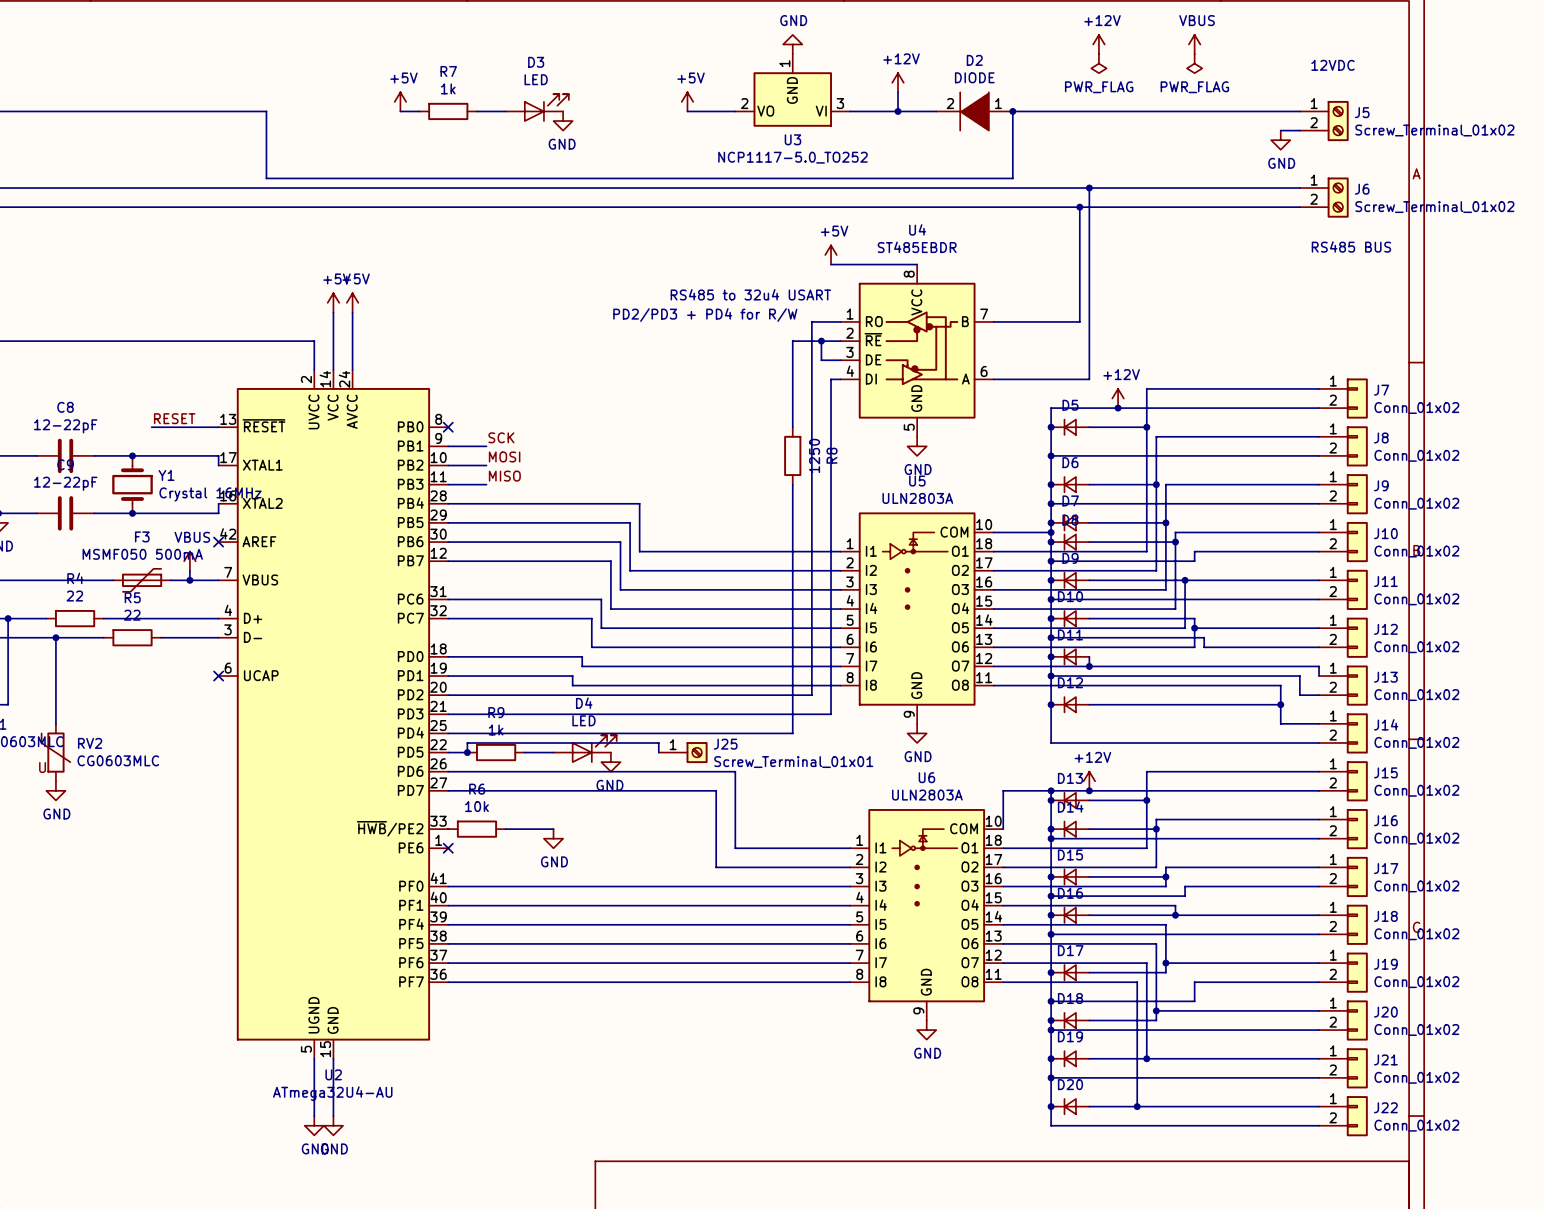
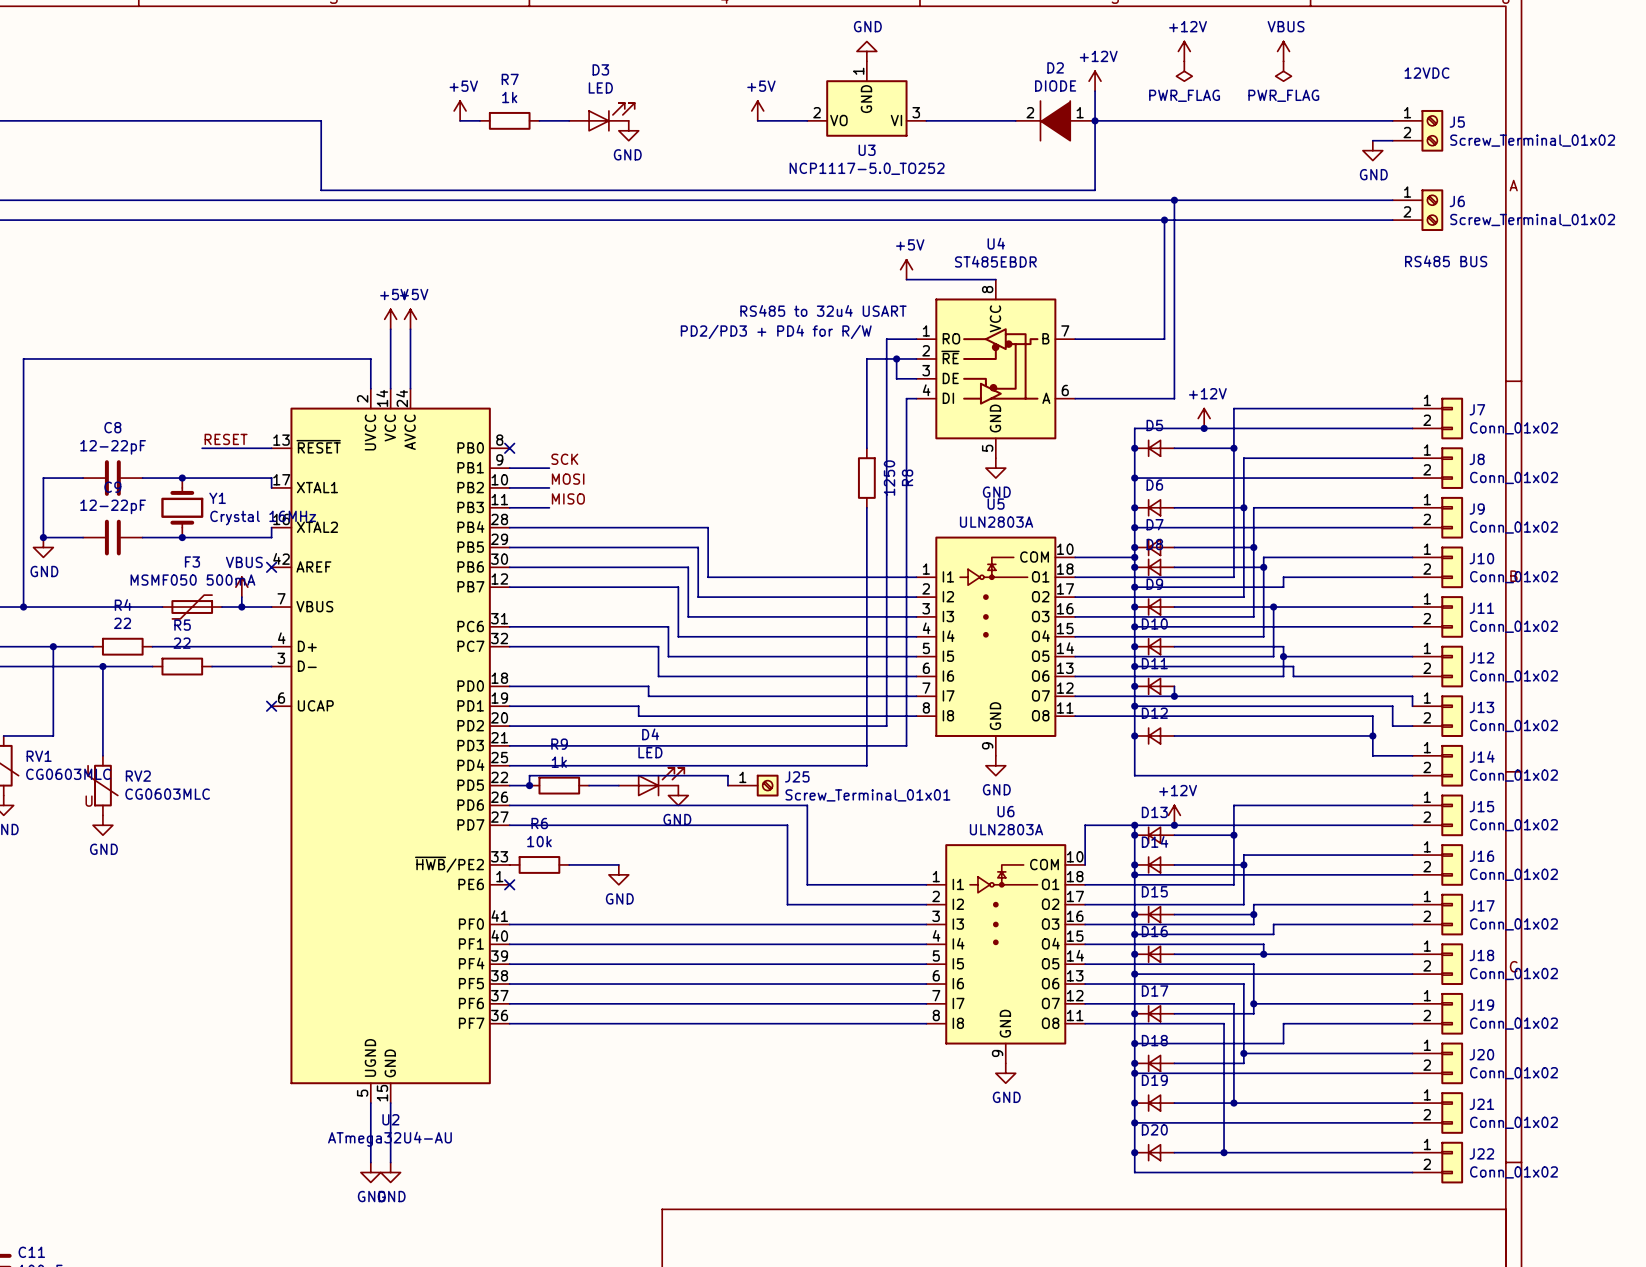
power symbol position: +12V (897, 82) -> +12V (1095, 81)
wire: none -> (1095, 91) (1095, 120)
wire: (897, 92) (897, 111) -> none
junction: (897, 111) -> none

